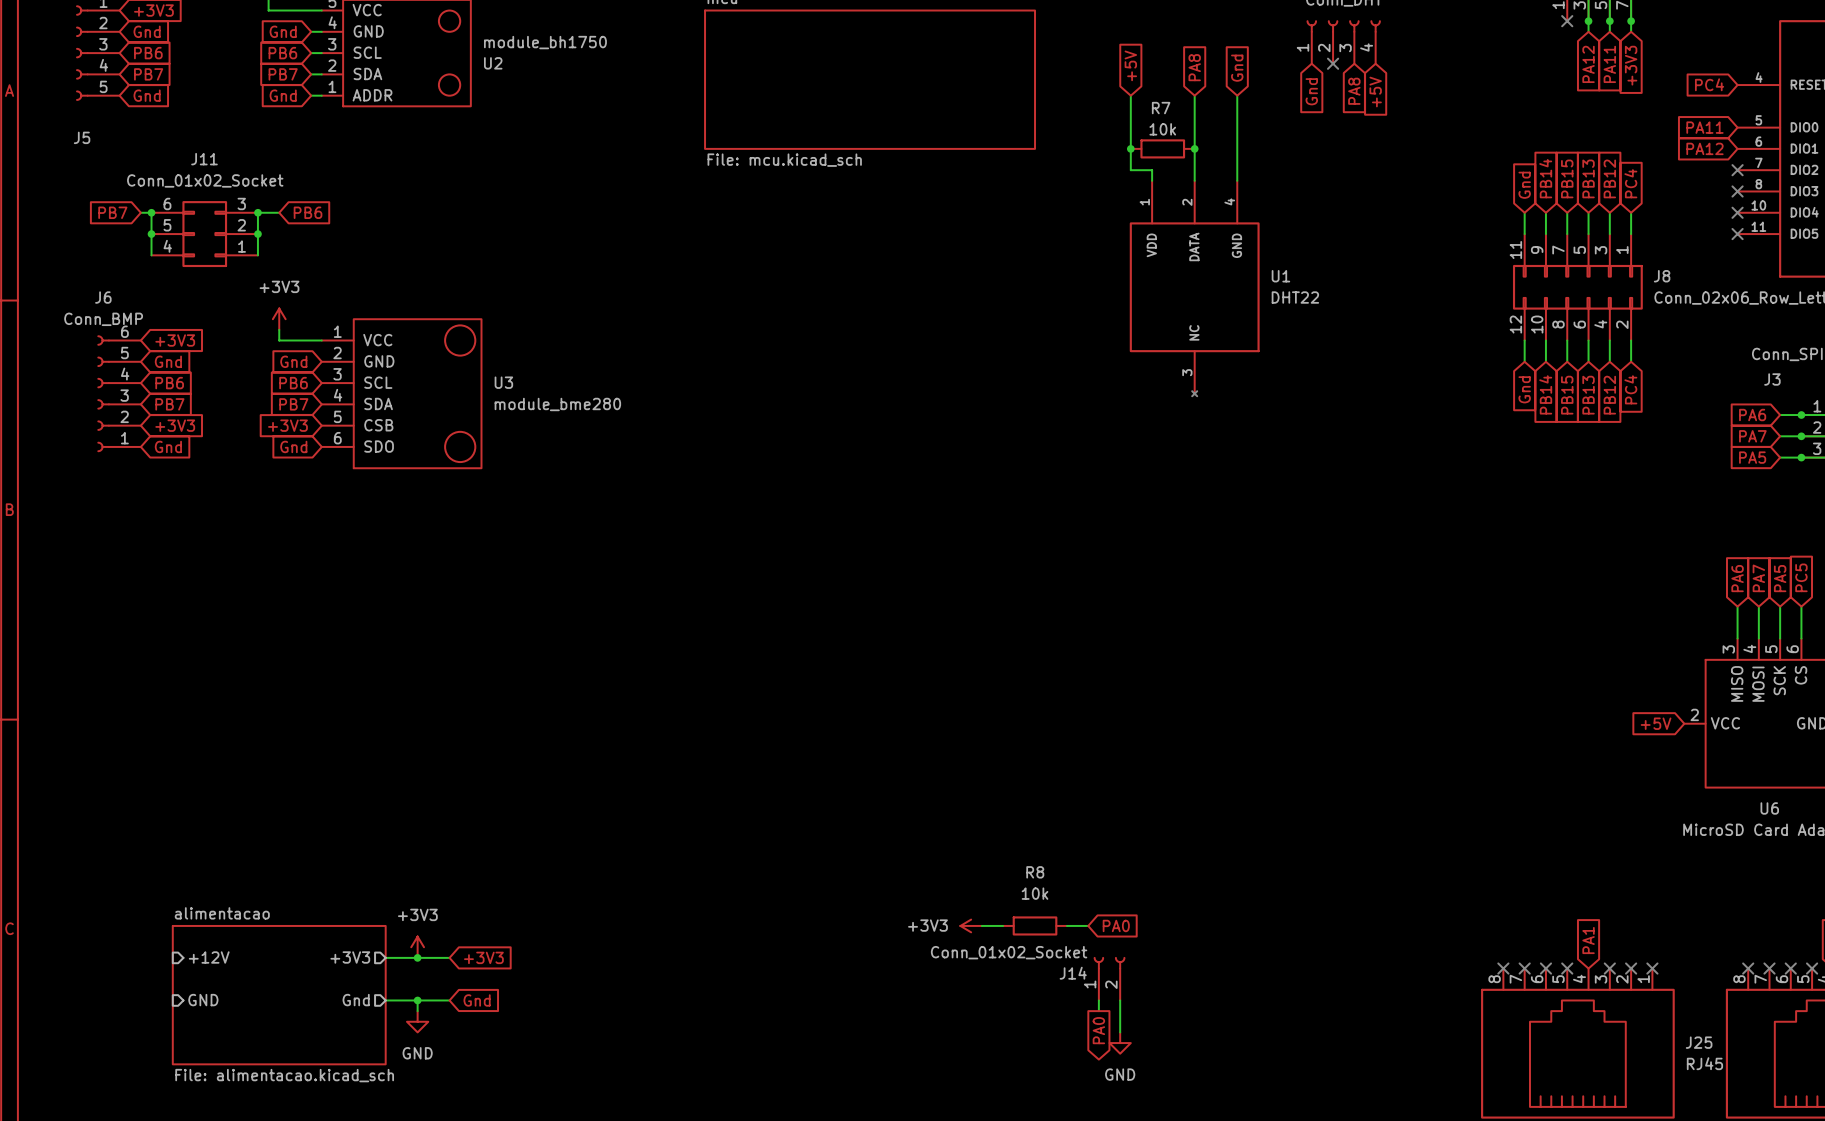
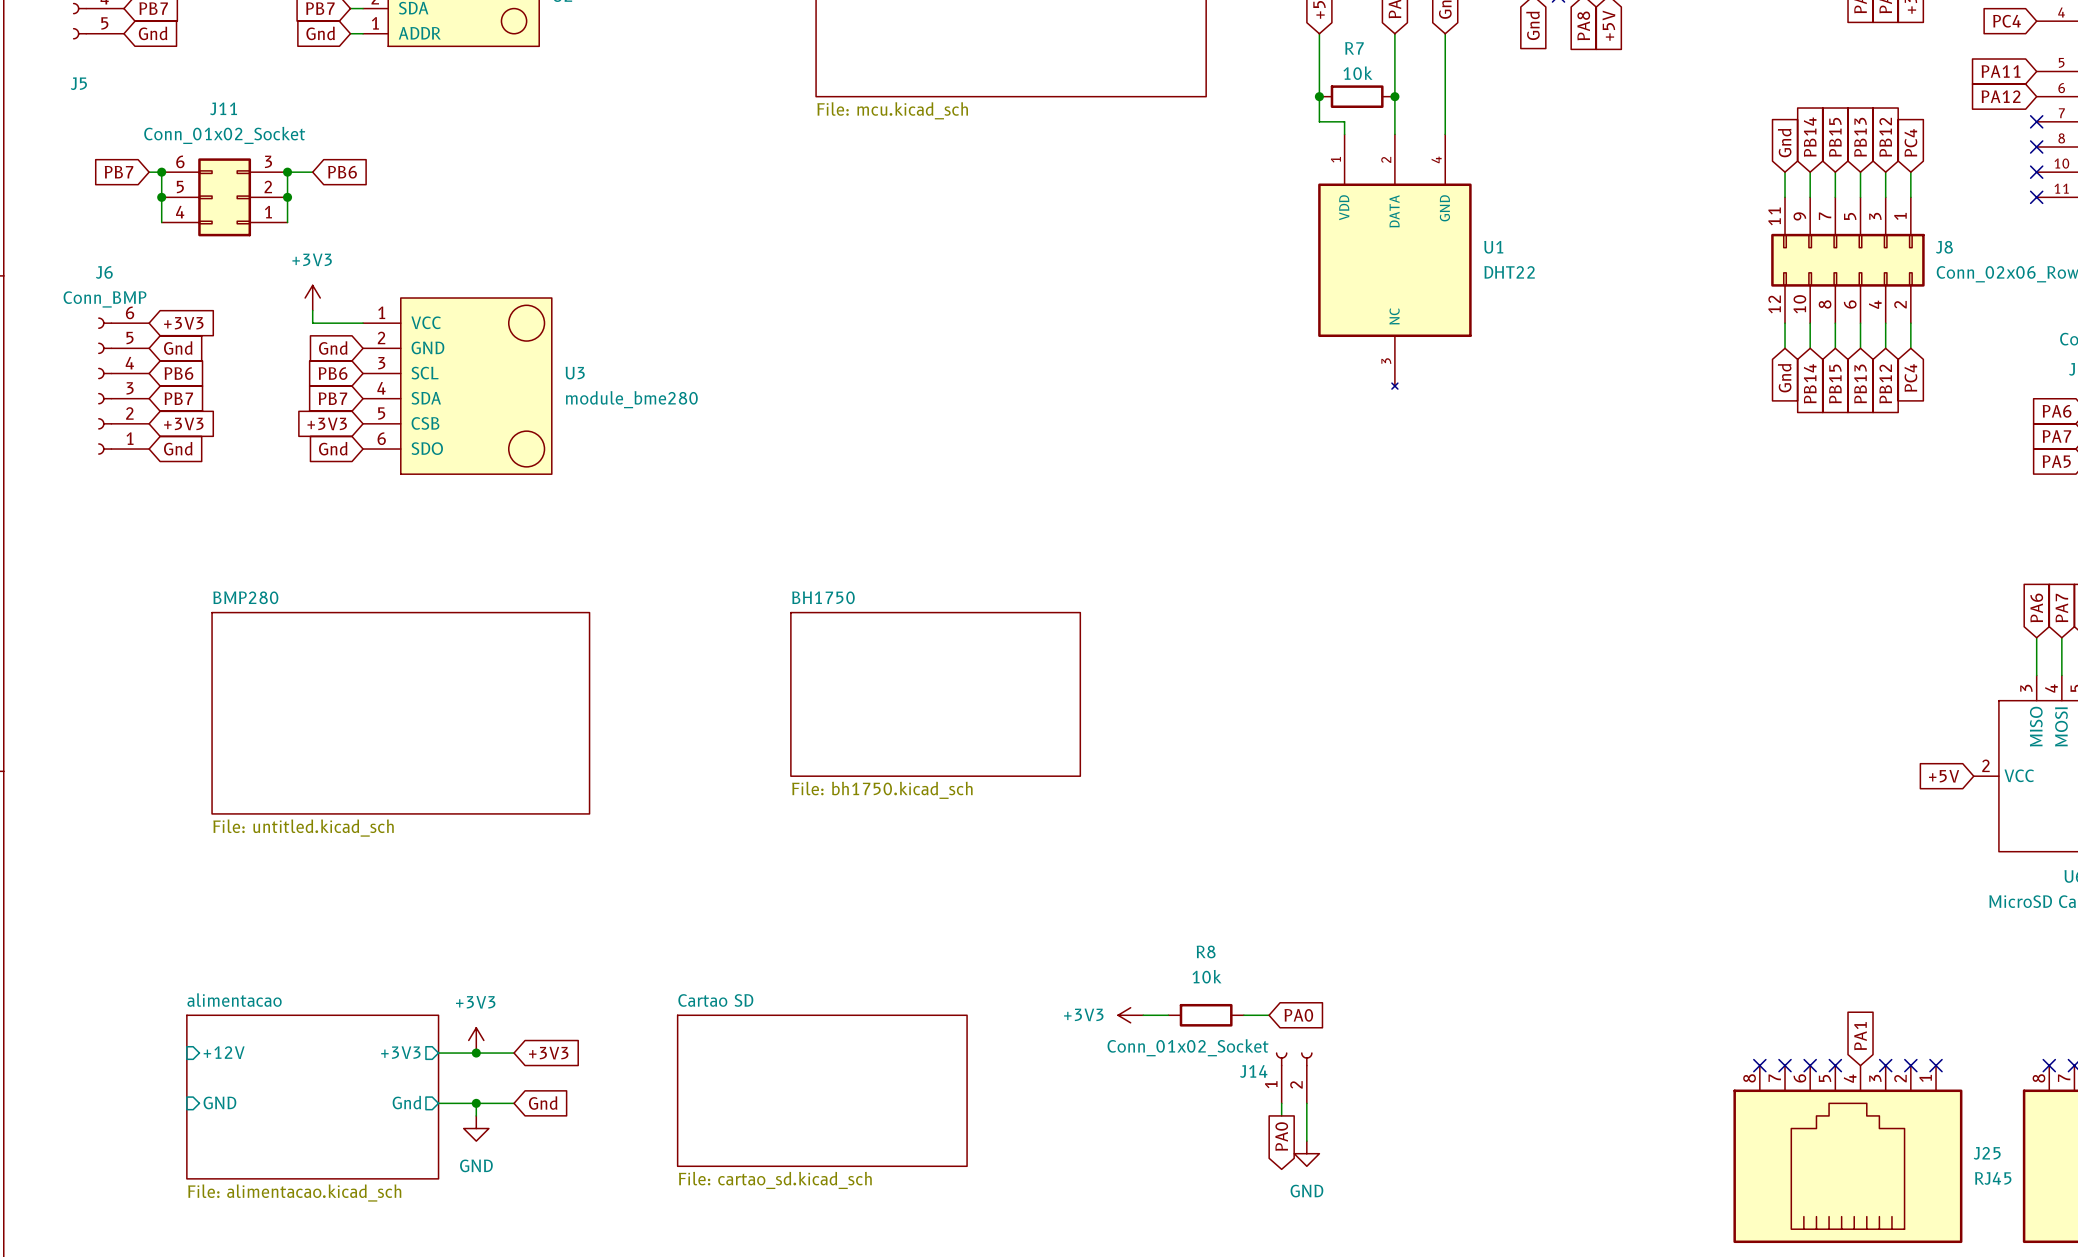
sheet BH1750: none -> File: bh1750.kicad_sch (935, 694)
sheet BMP280: none -> File: untitled.kicad_sch (400, 713)
sheet Cartao SD: none -> File: cartao_sd.kicad_sch (822, 1090)

